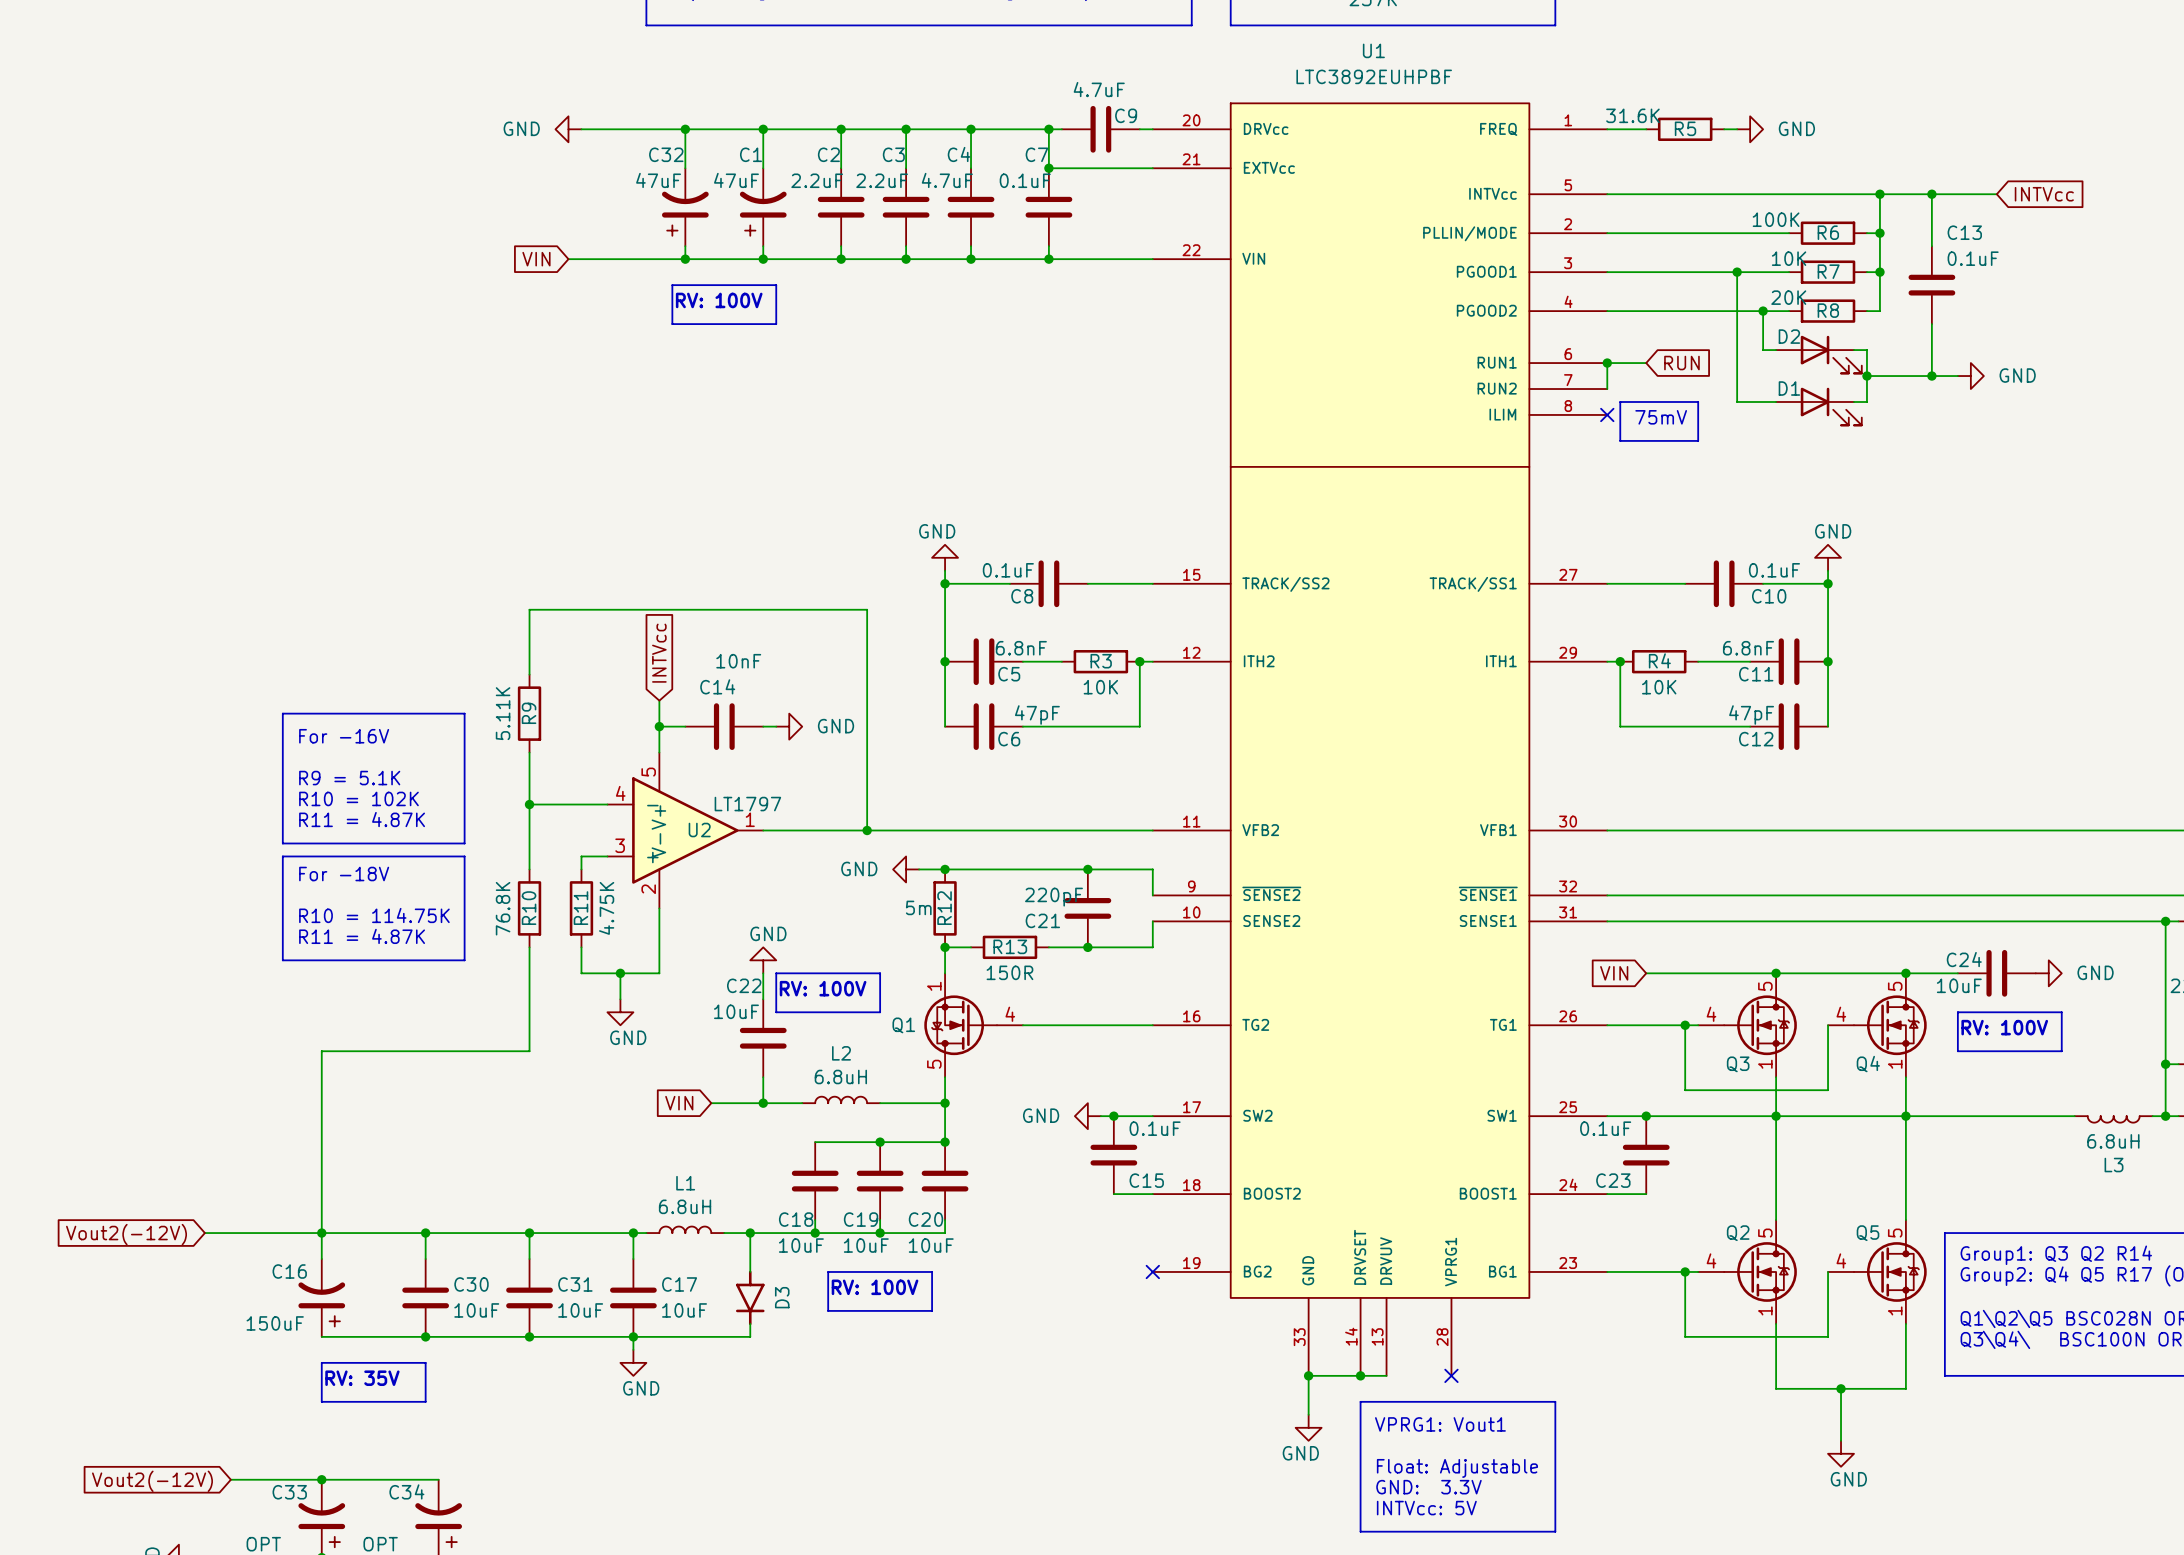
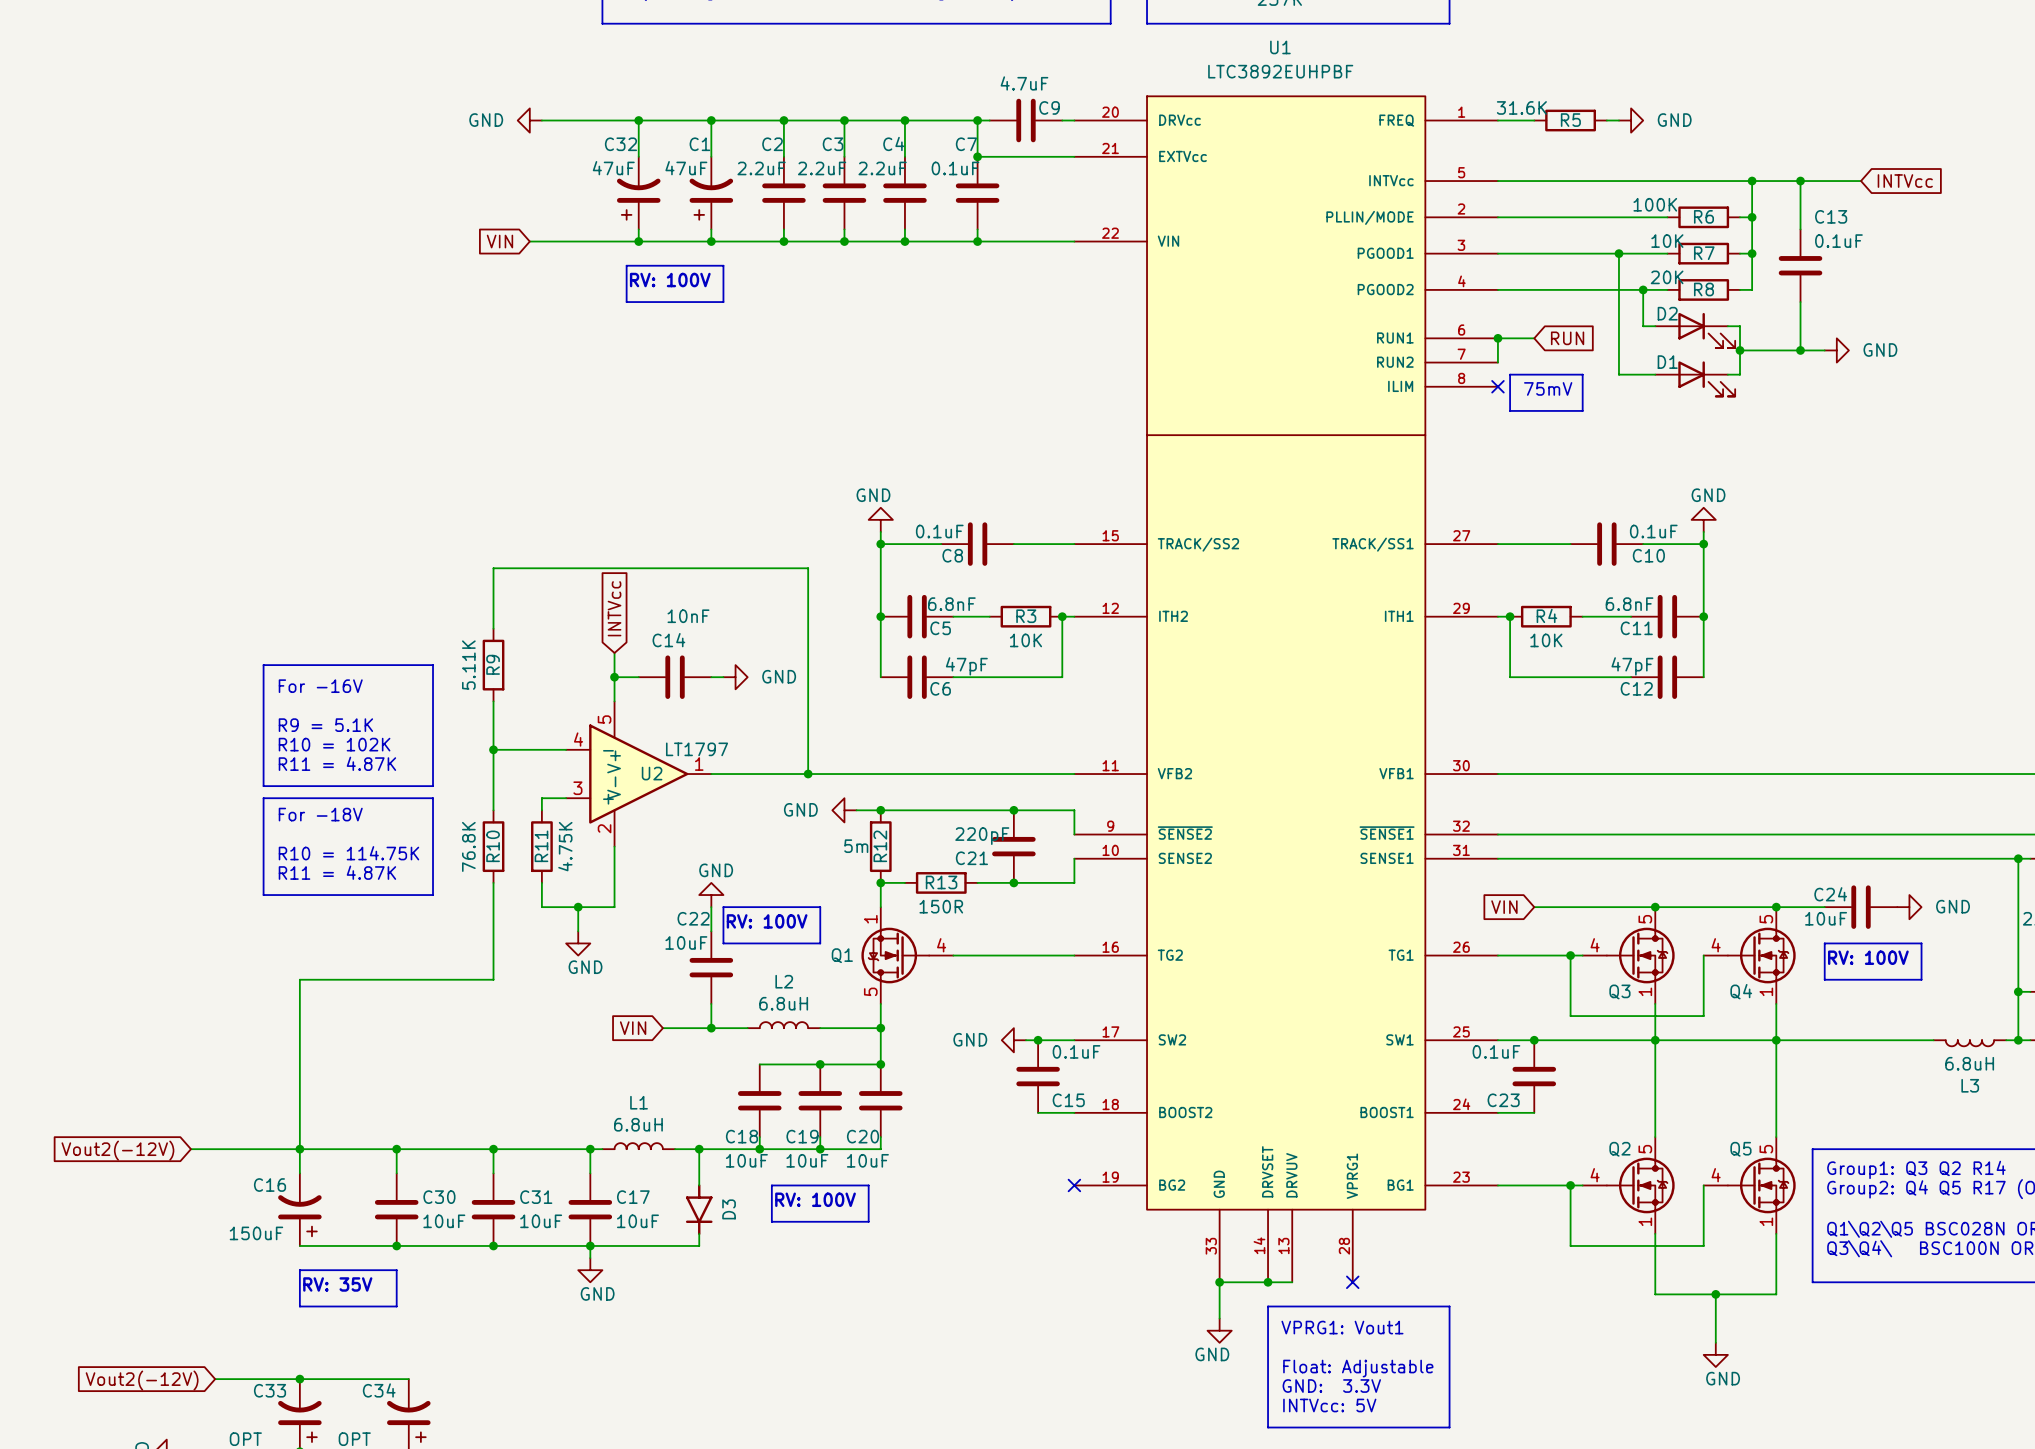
C4 value: 4.7uF (947, 180) -> 2.2uF (882, 168)

